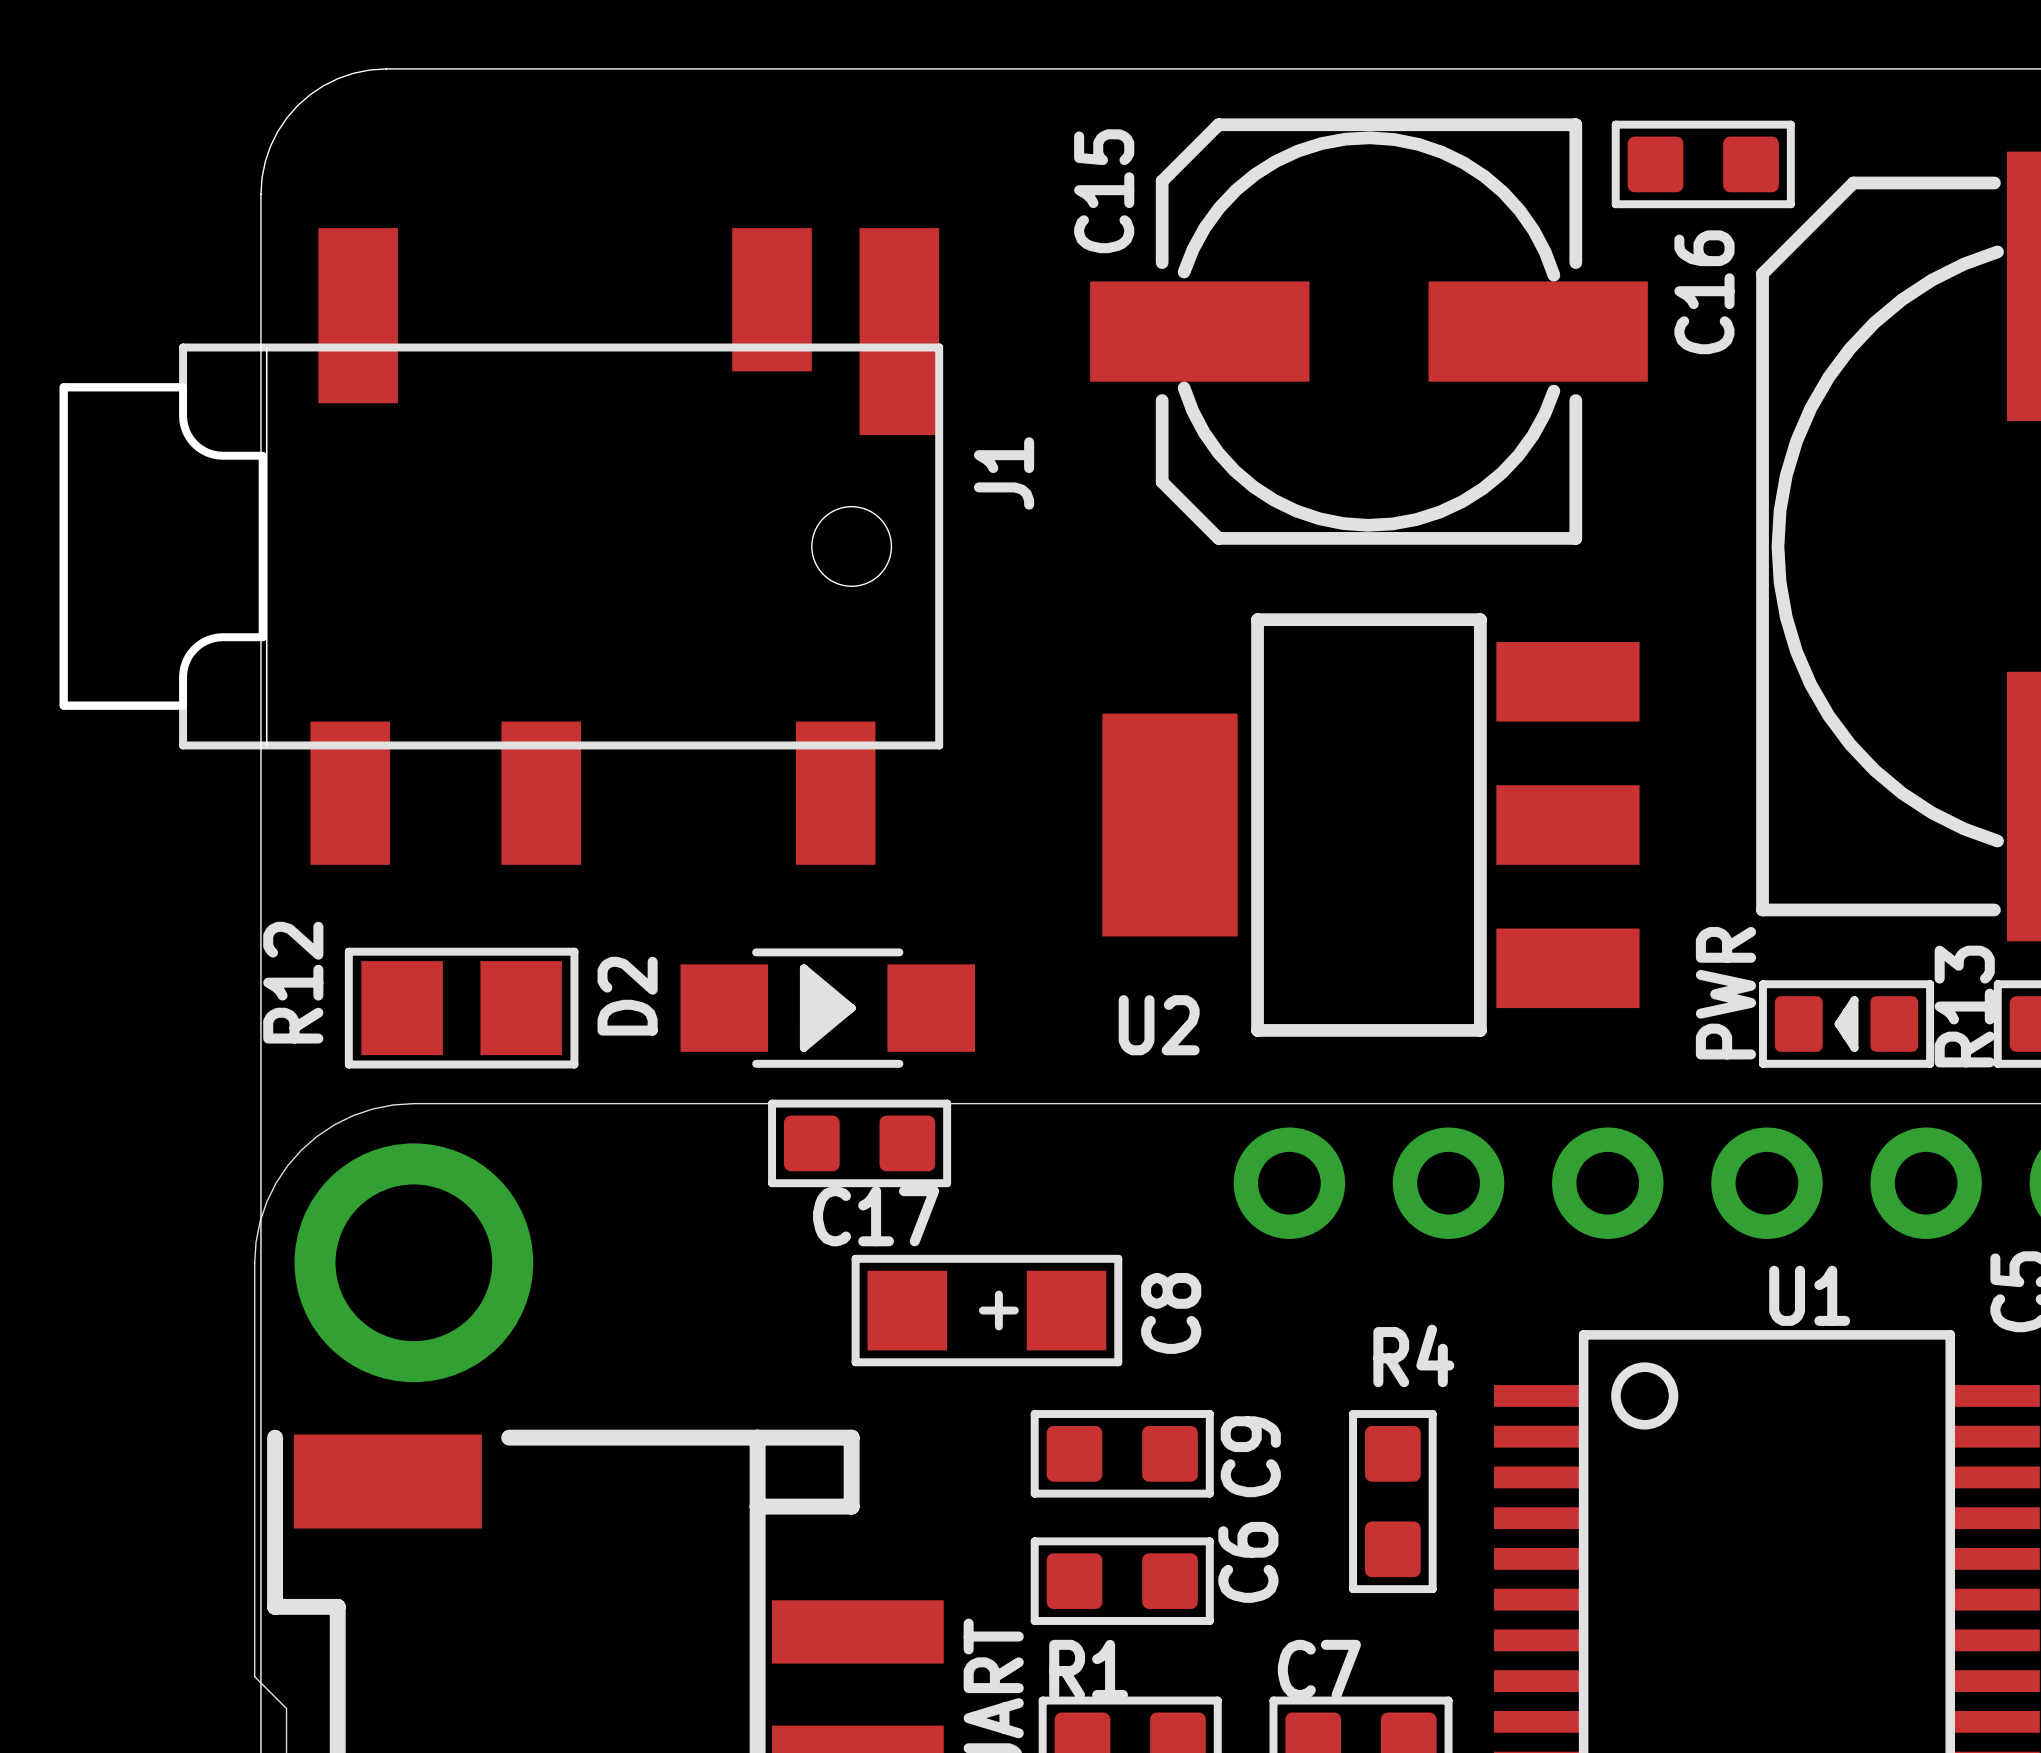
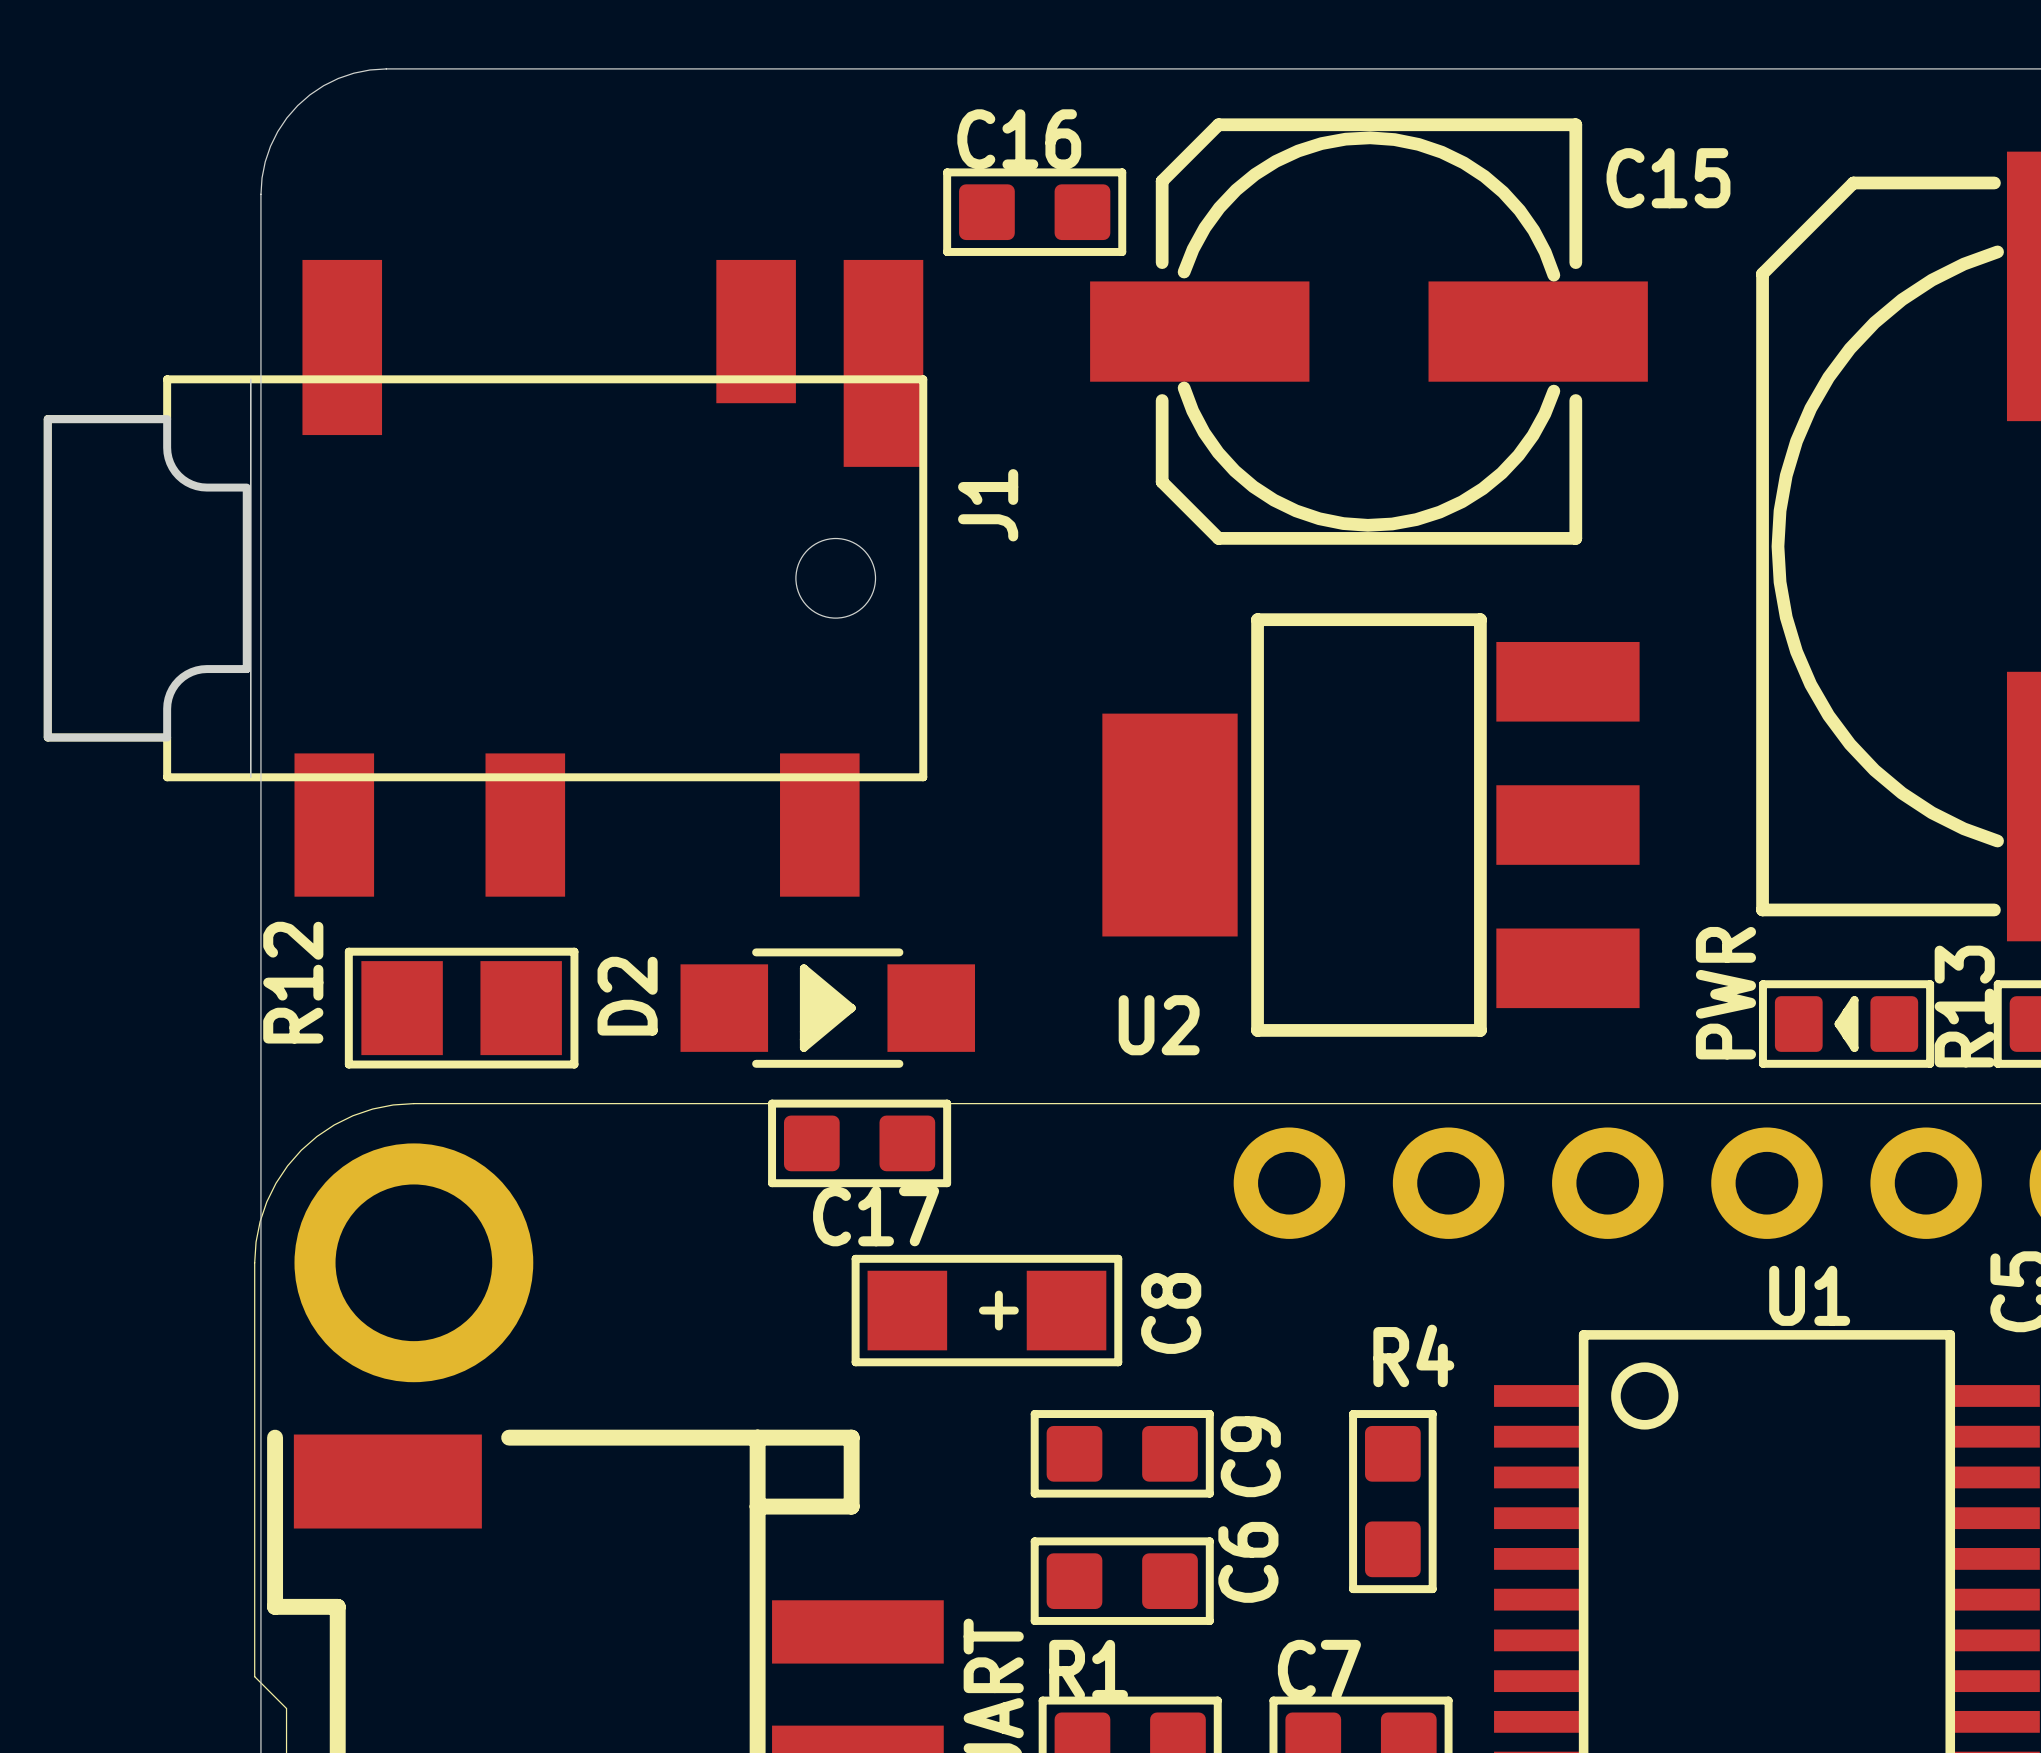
C16 position: (1703, 164) -> (1034, 212)
C15 name rotation: 0° (1104, 191) -> 90° clockwise (1668, 178)
C15 name position: C15 (1104, 191) -> C15 (1668, 178)
C16 name rotation: 0° (1704, 292) -> 90° clockwise (1019, 139)
C16 name position: C16 (1704, 292) -> C16 (1019, 139)
J1 position: (501, 546) -> (485, 578)

